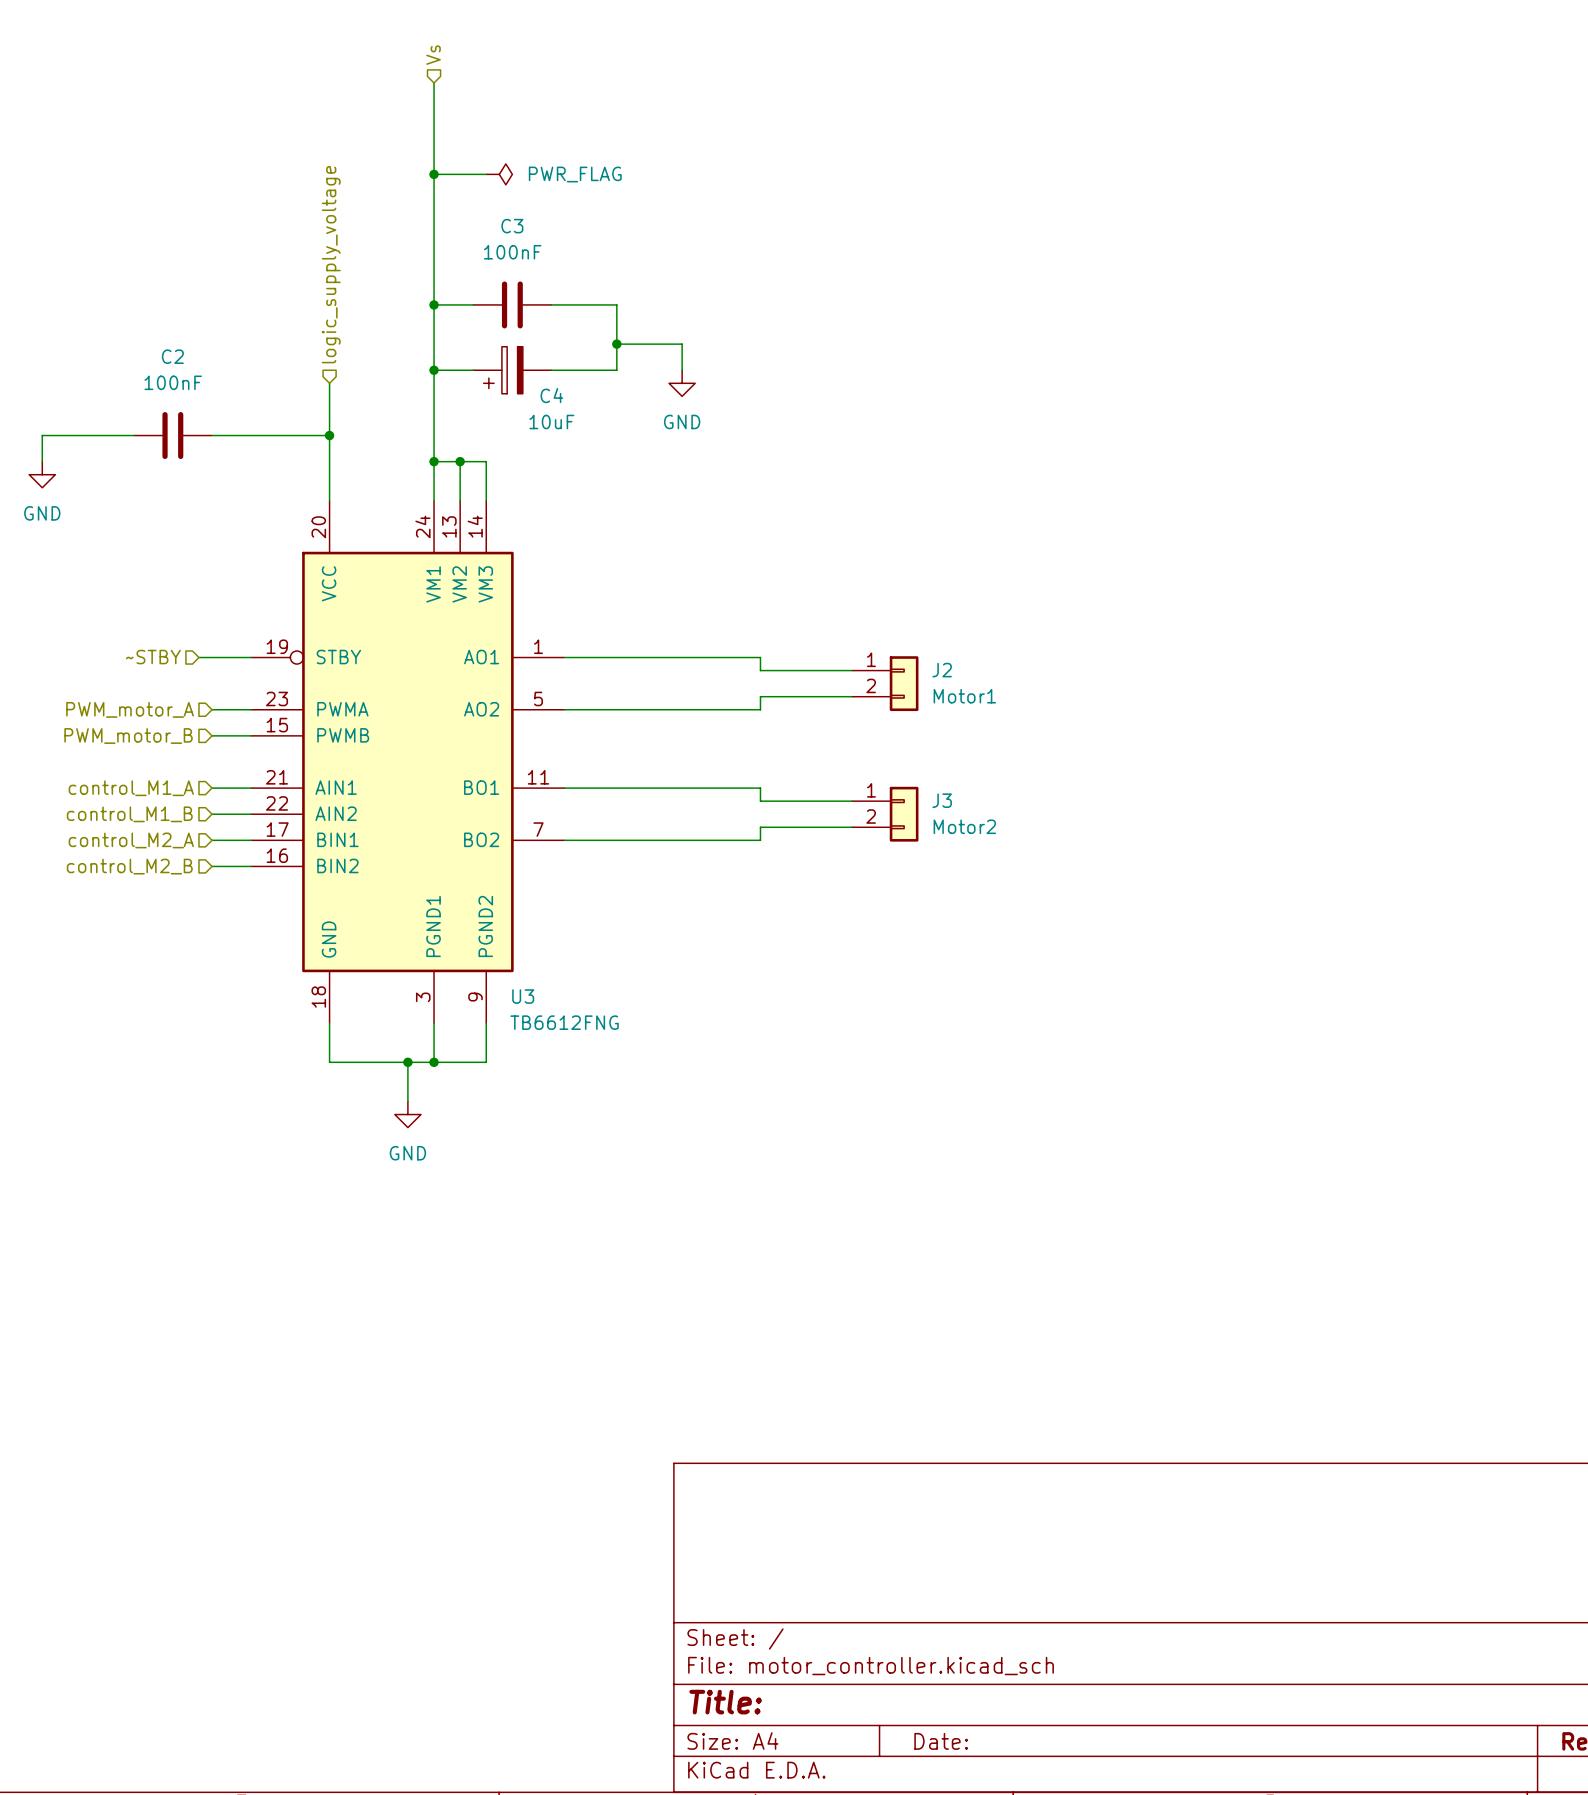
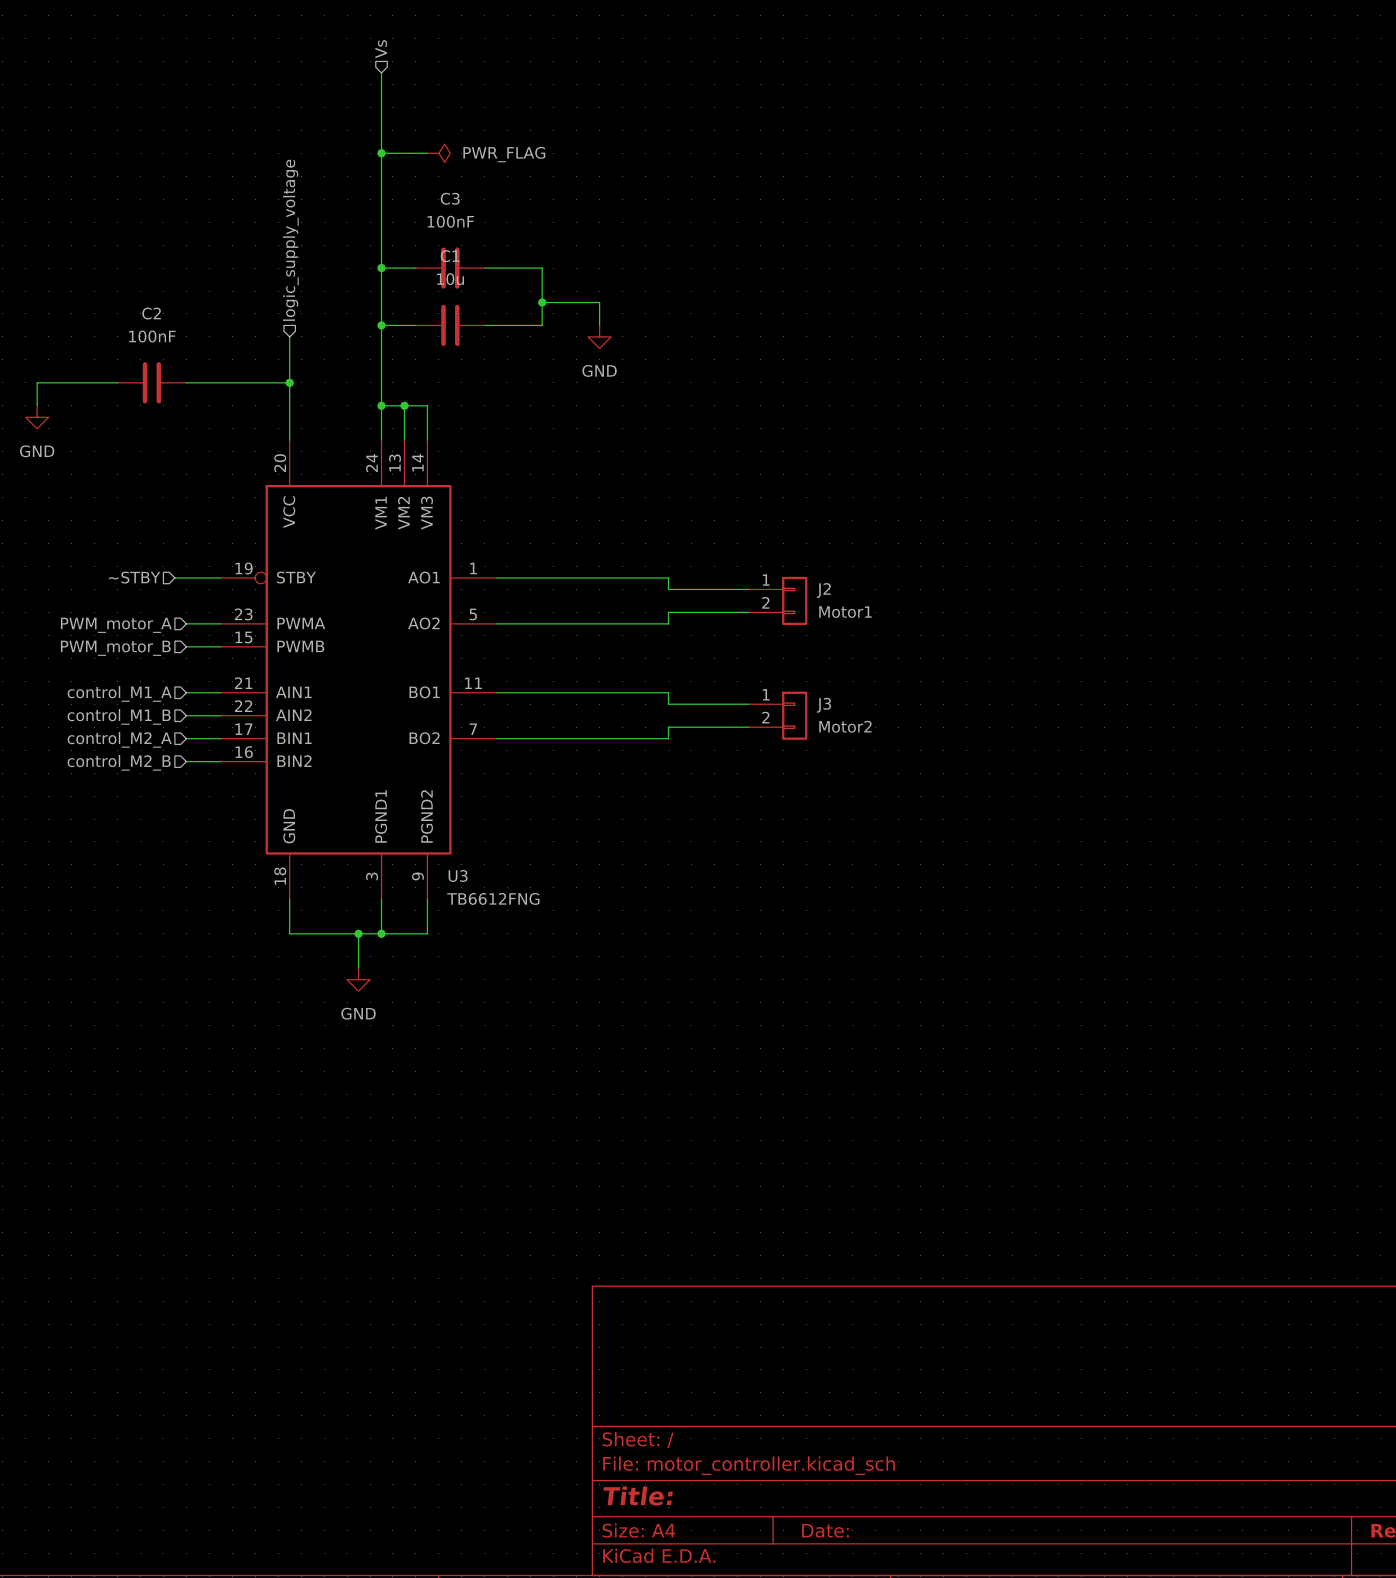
C4: 10uF (512, 370) -> none
C1: none -> 10u (450, 325)

